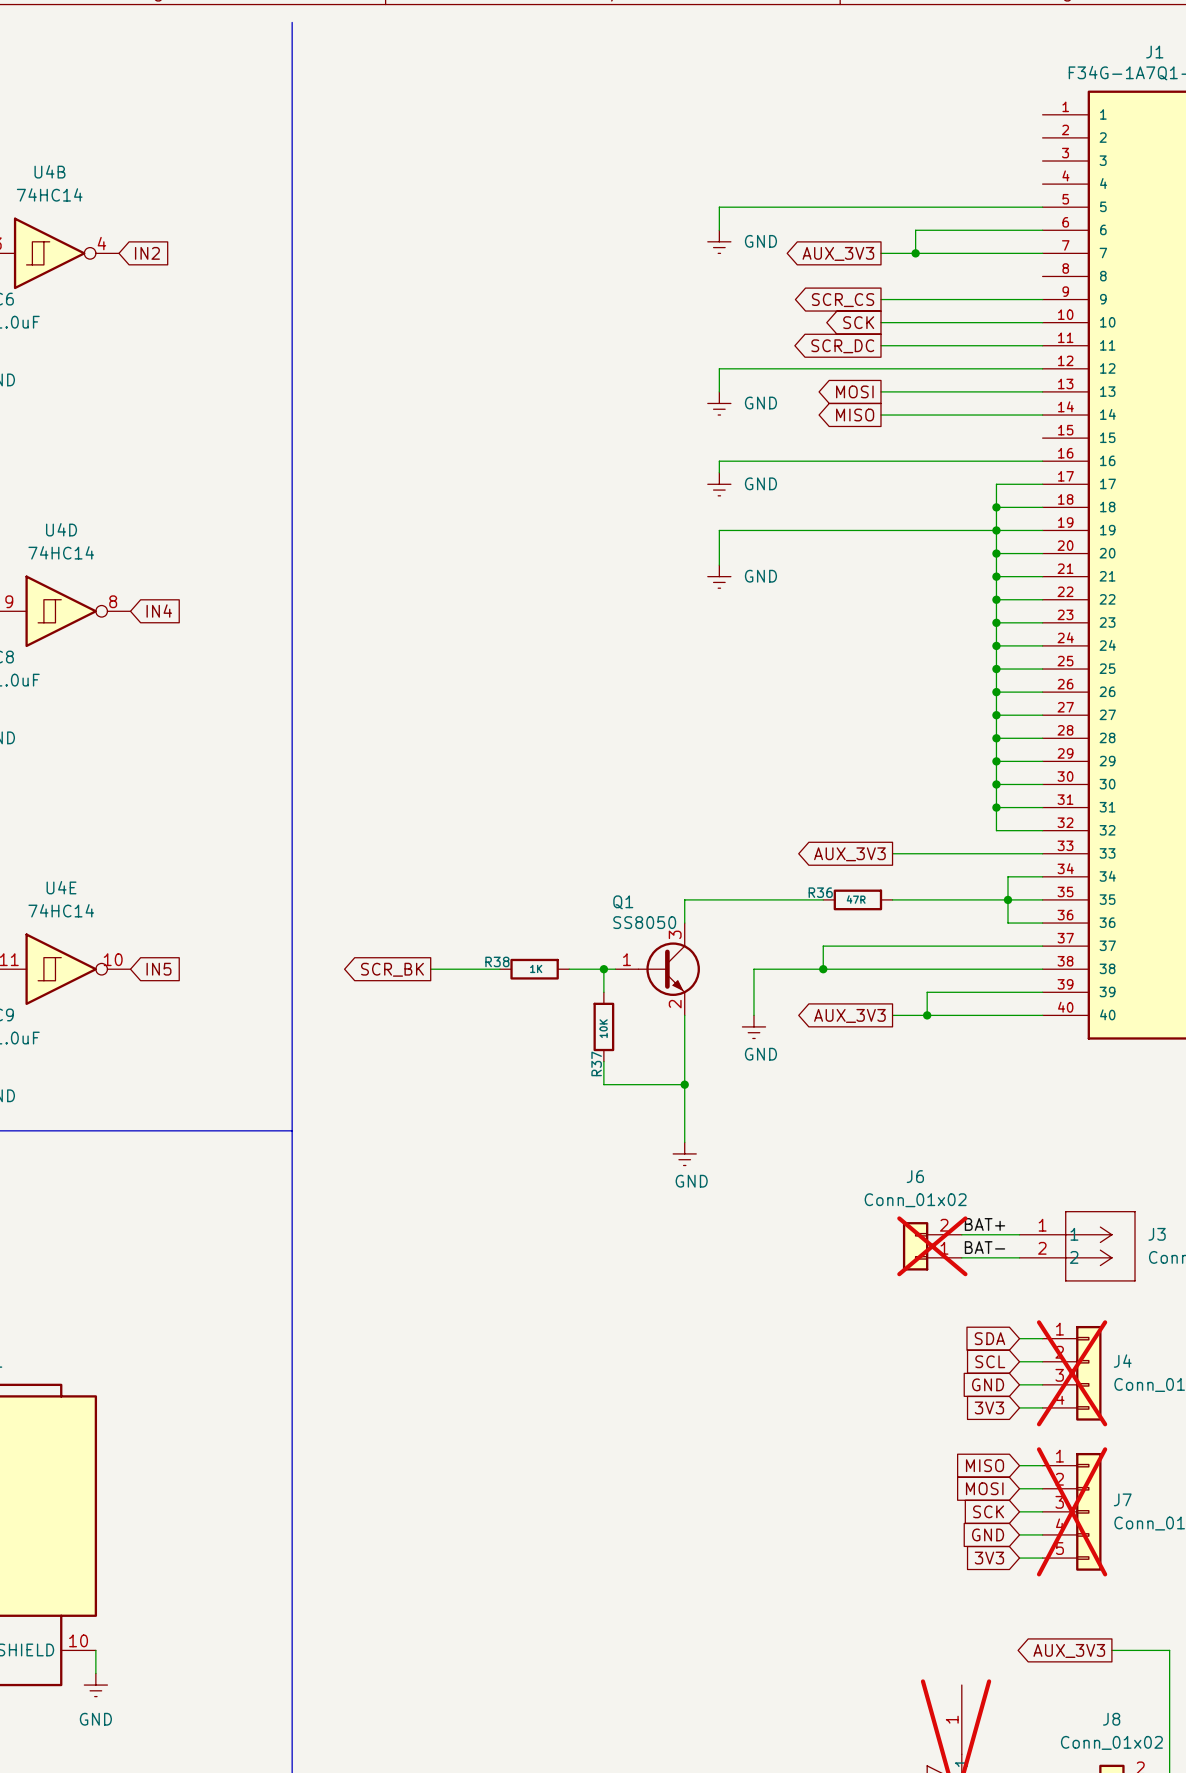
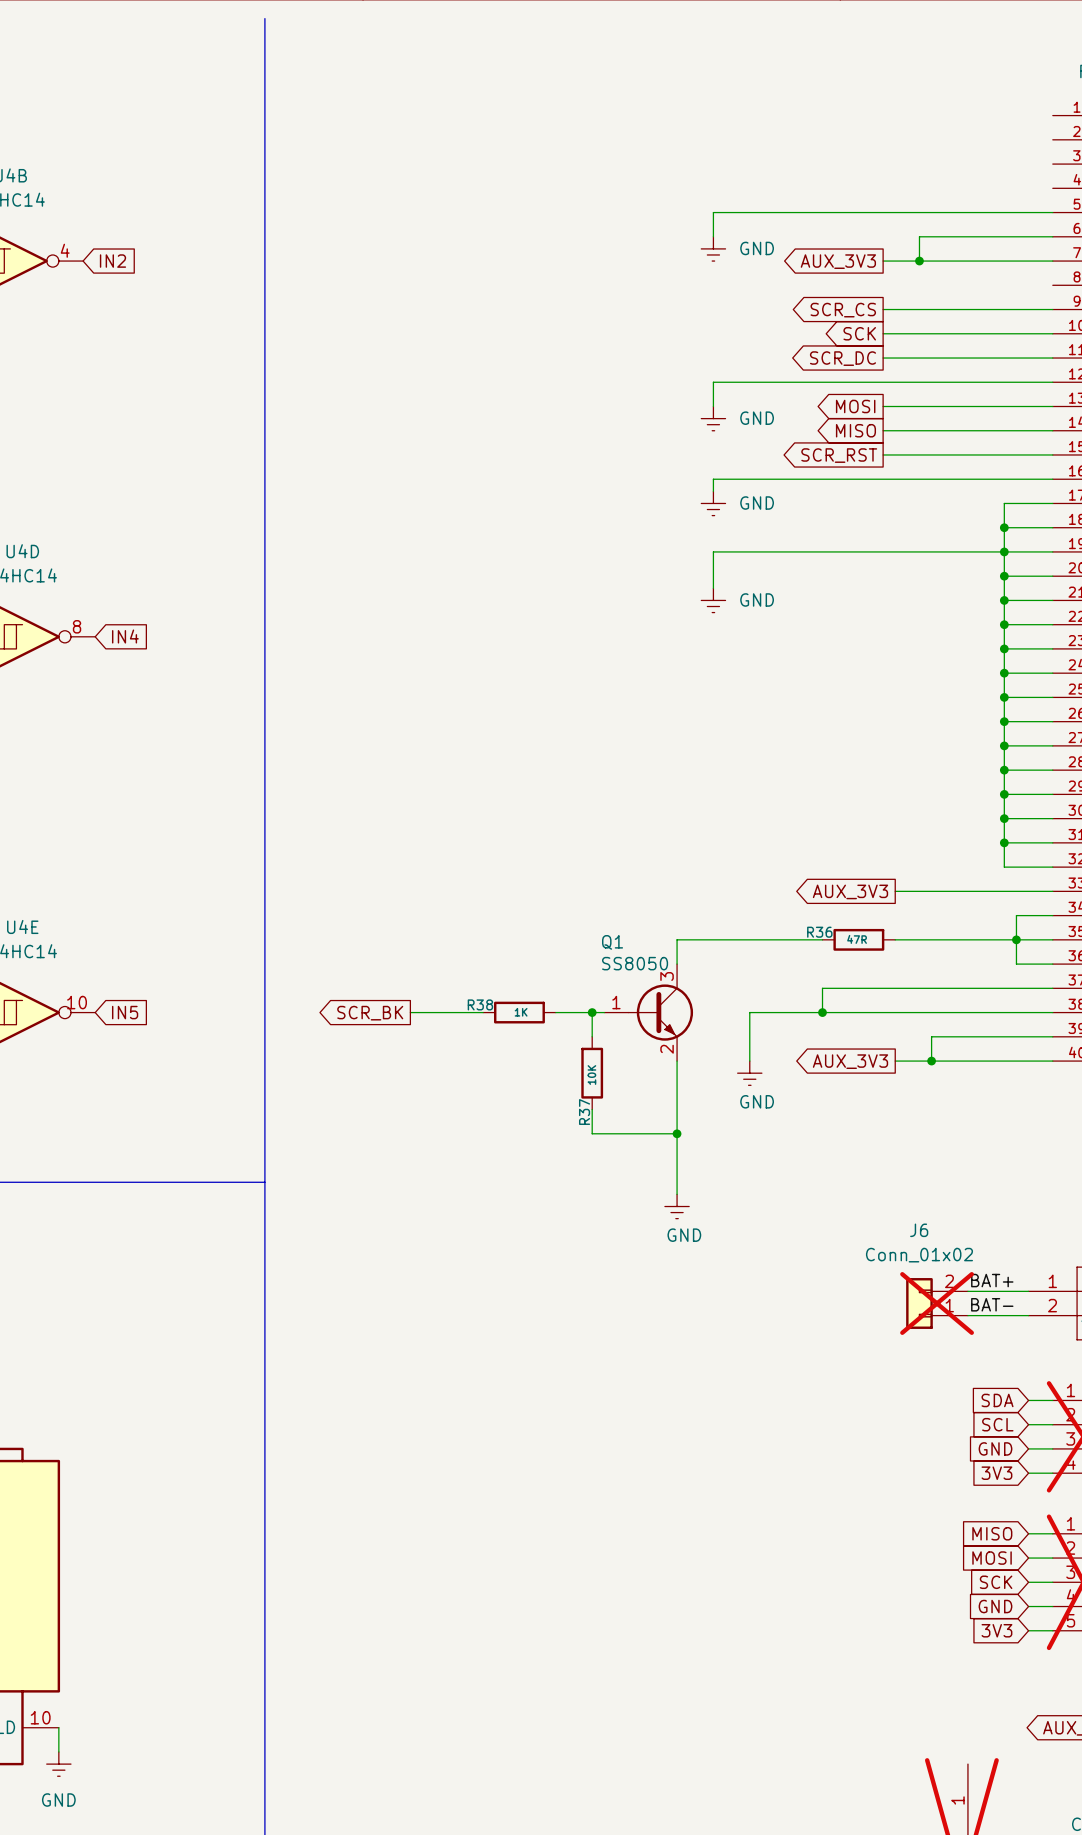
global label: none -> SCR_RST (839, 455)
wire: none -> (883, 454) (1052, 454)

